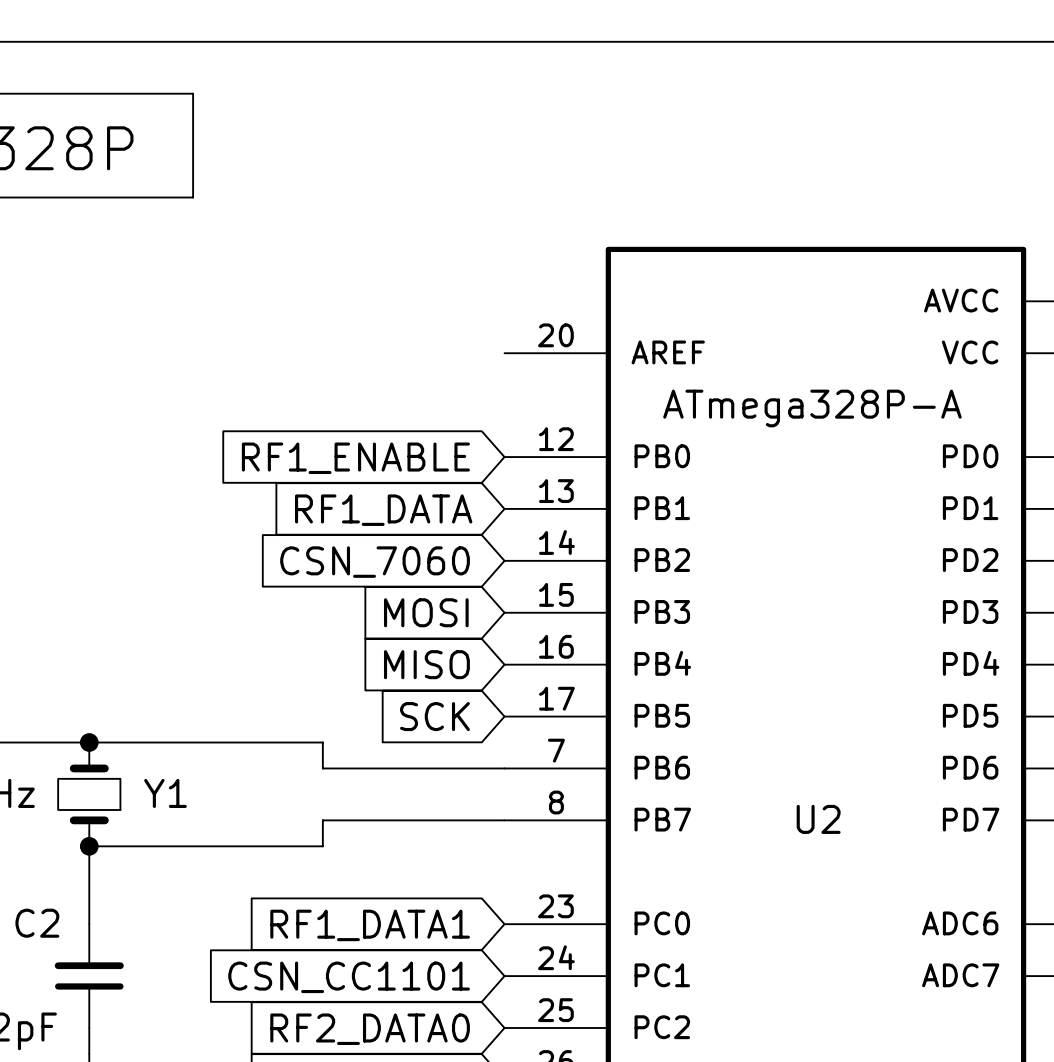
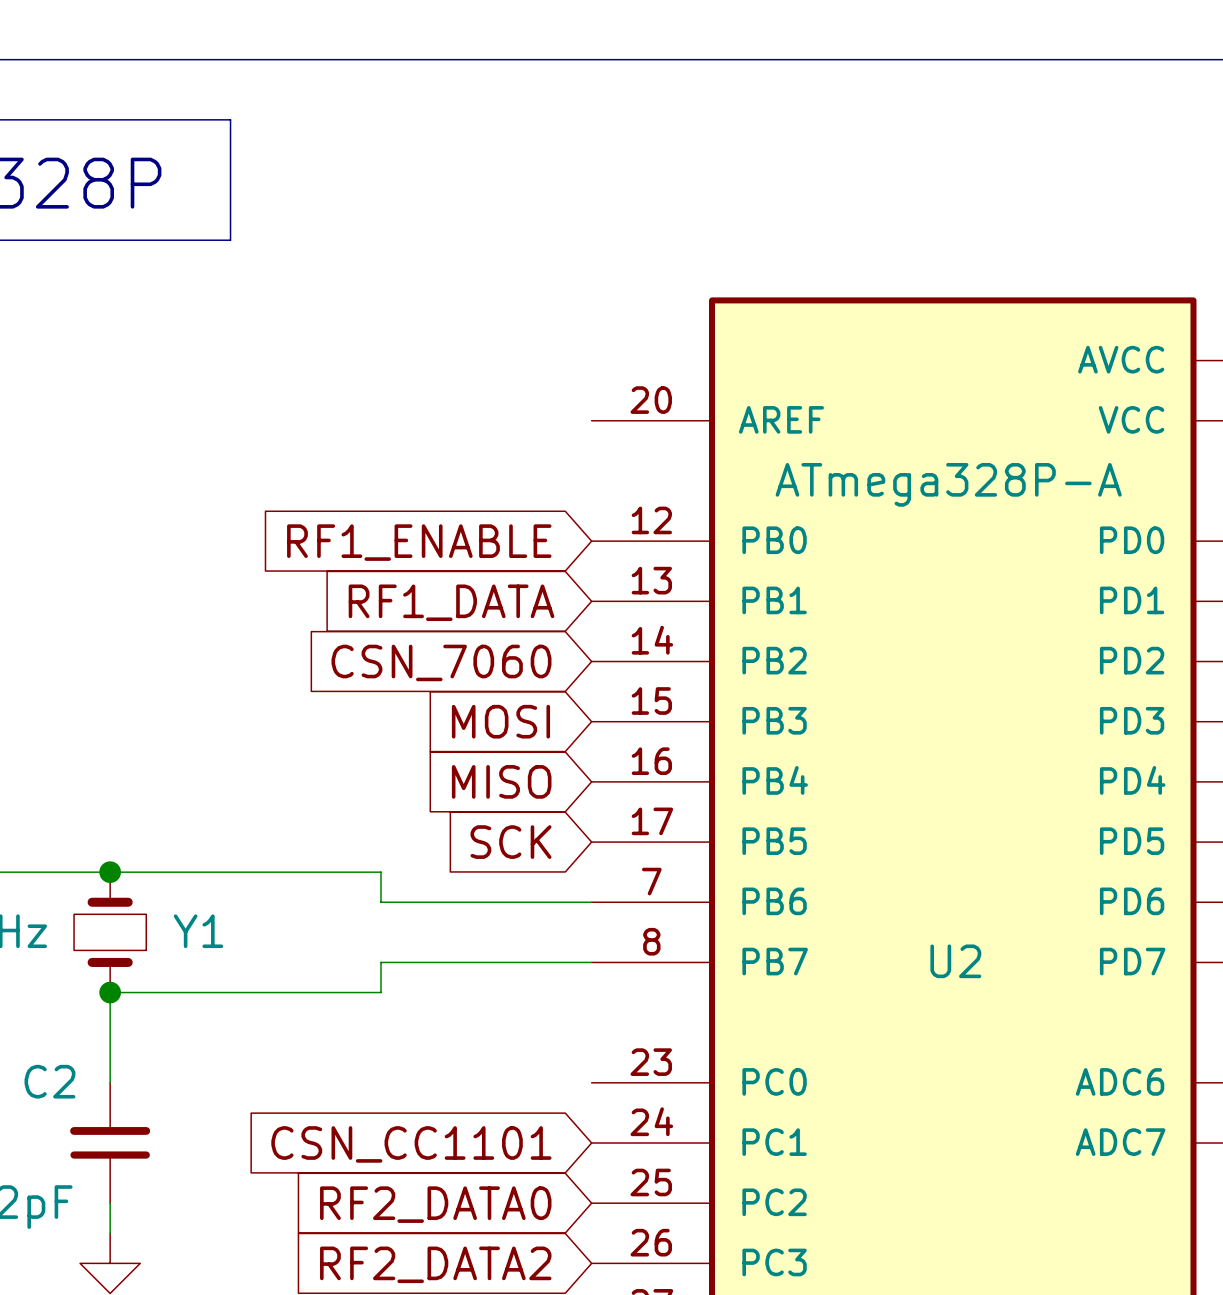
global label: RF1_DATA1 (370, 925) -> none

